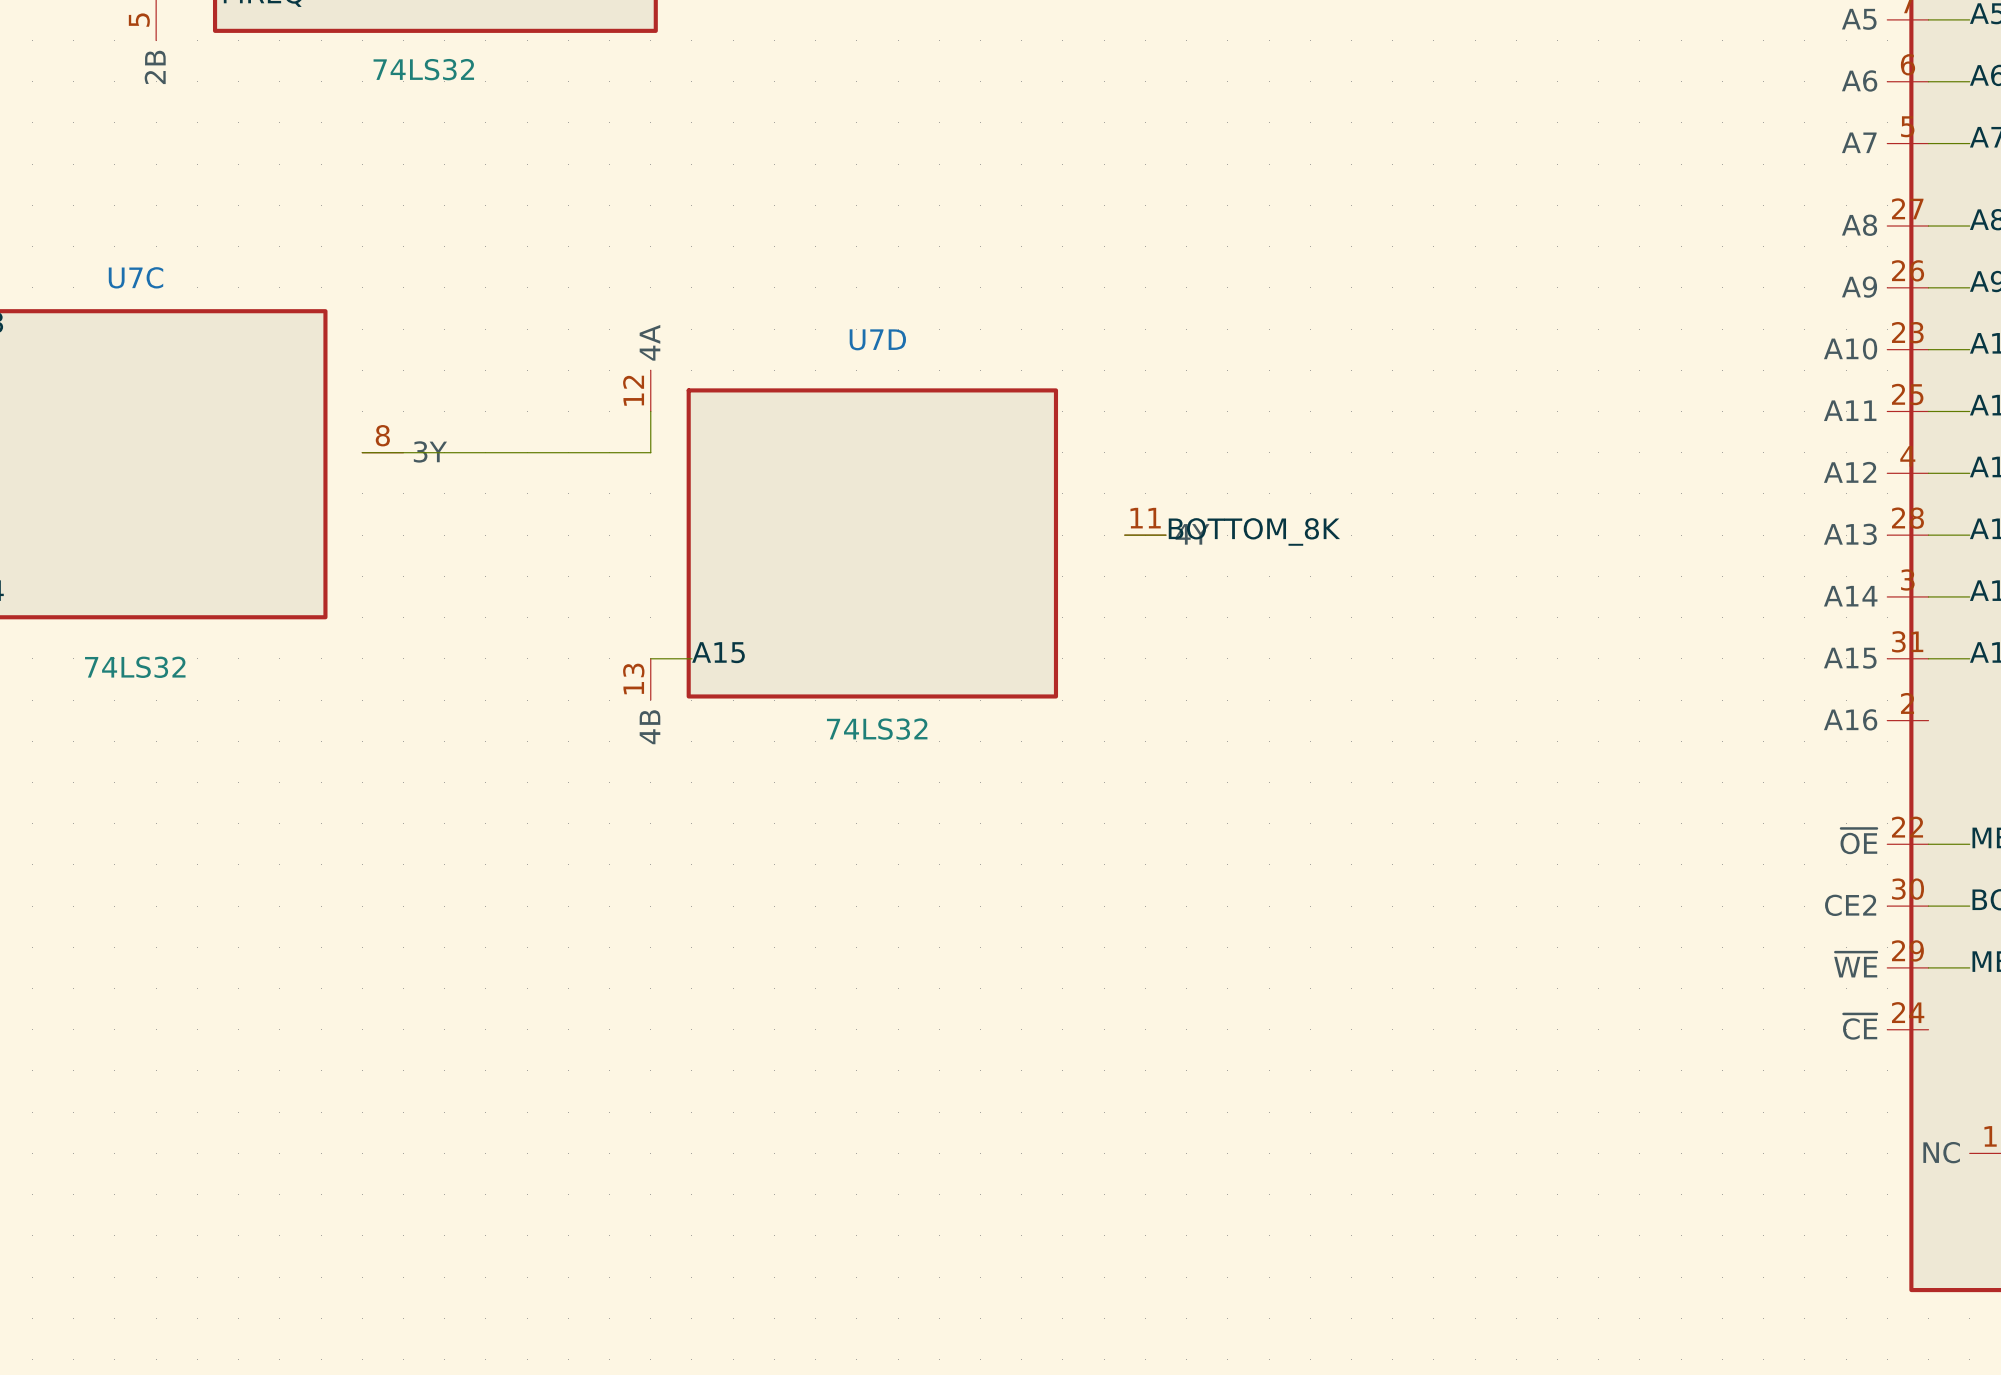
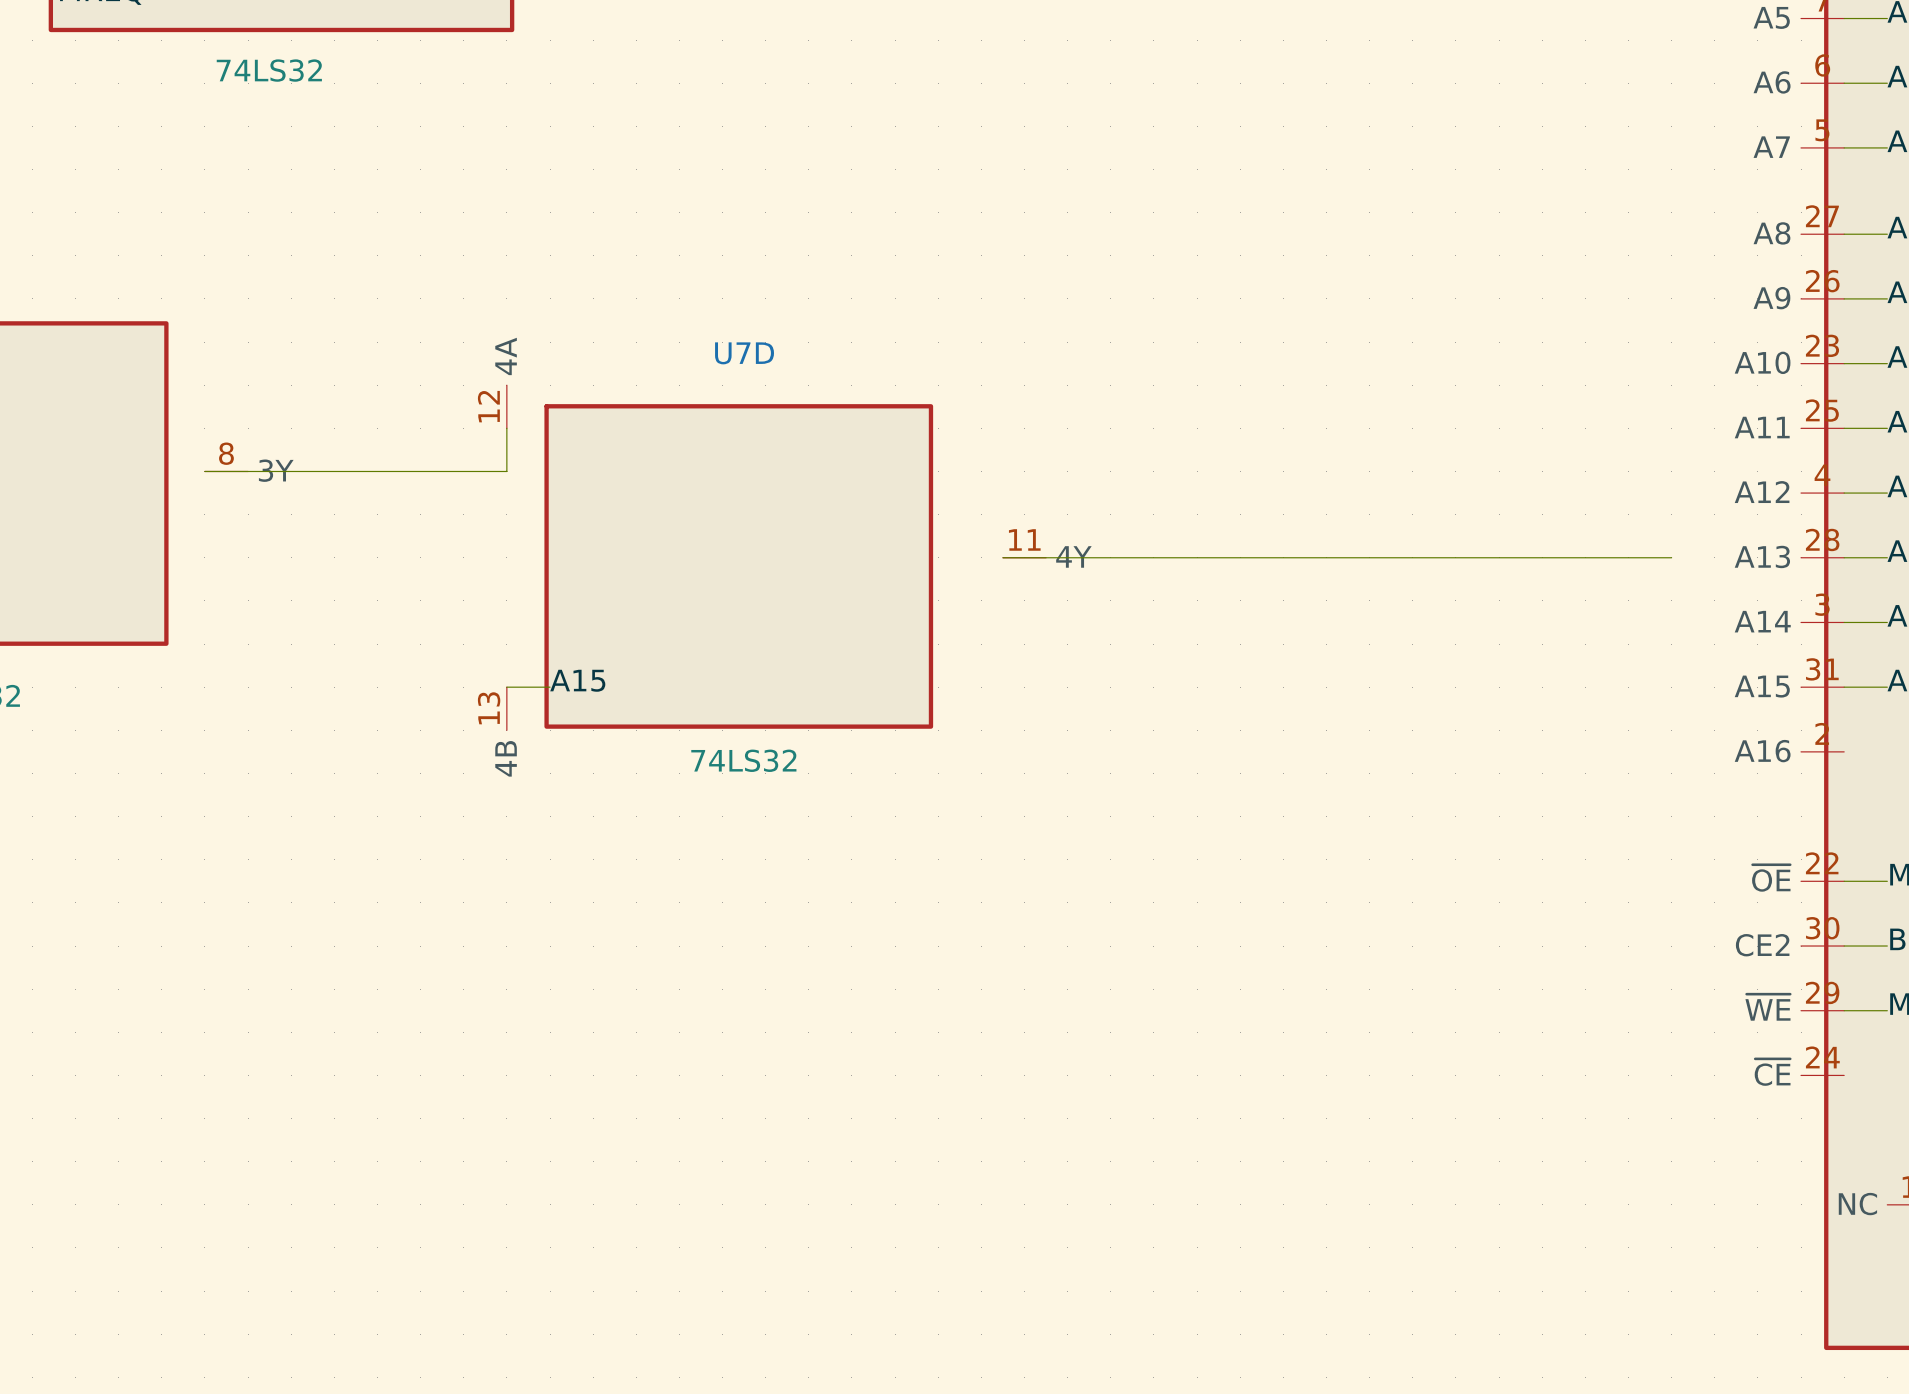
label: BOTTOM_8K (1254, 531) -> none
wire: none -> (1046, 557) (1671, 557)

